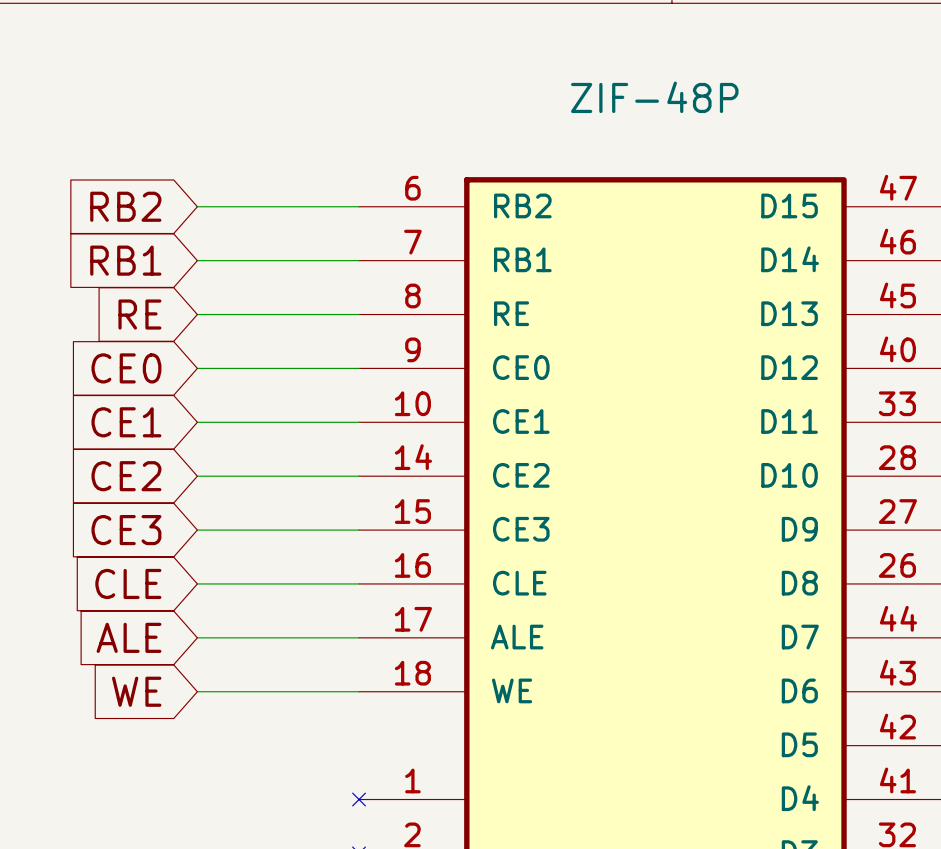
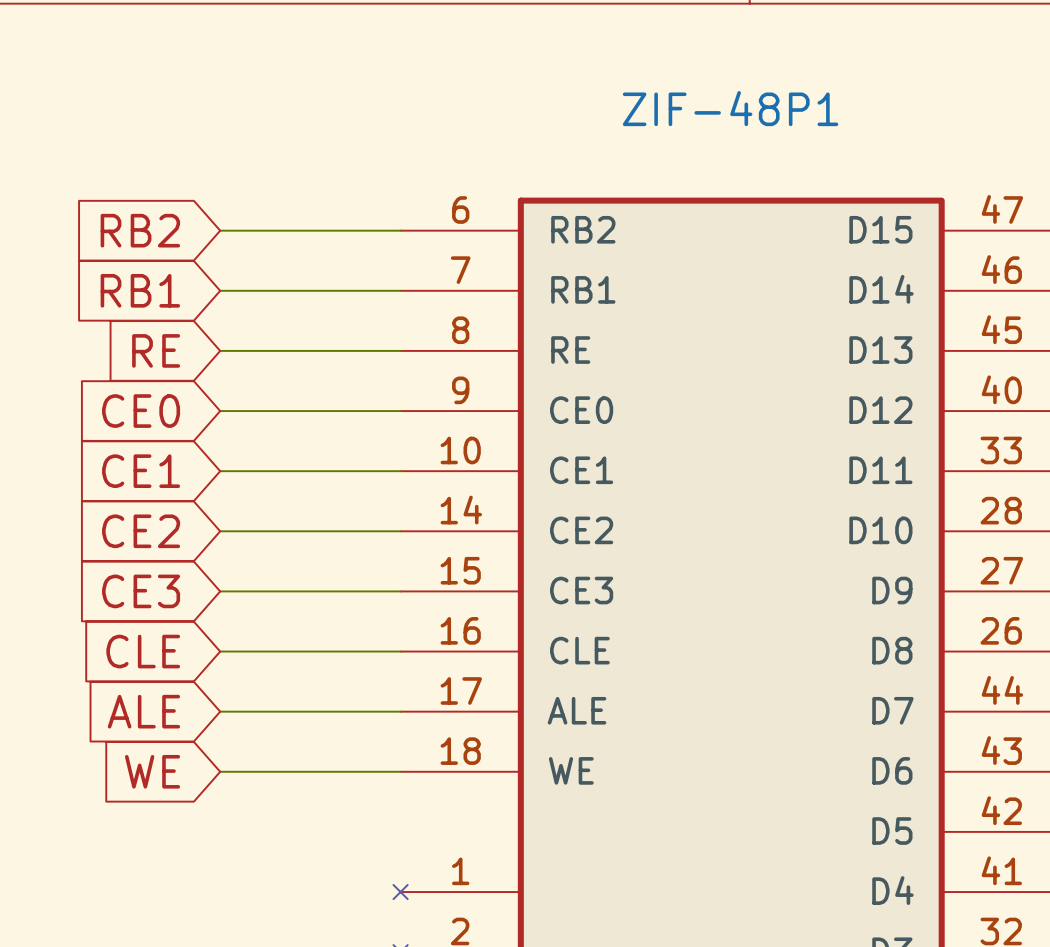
ZIF-48P name: ZIF-48P (654, 97) -> ZIF-48P1 (730, 108)

